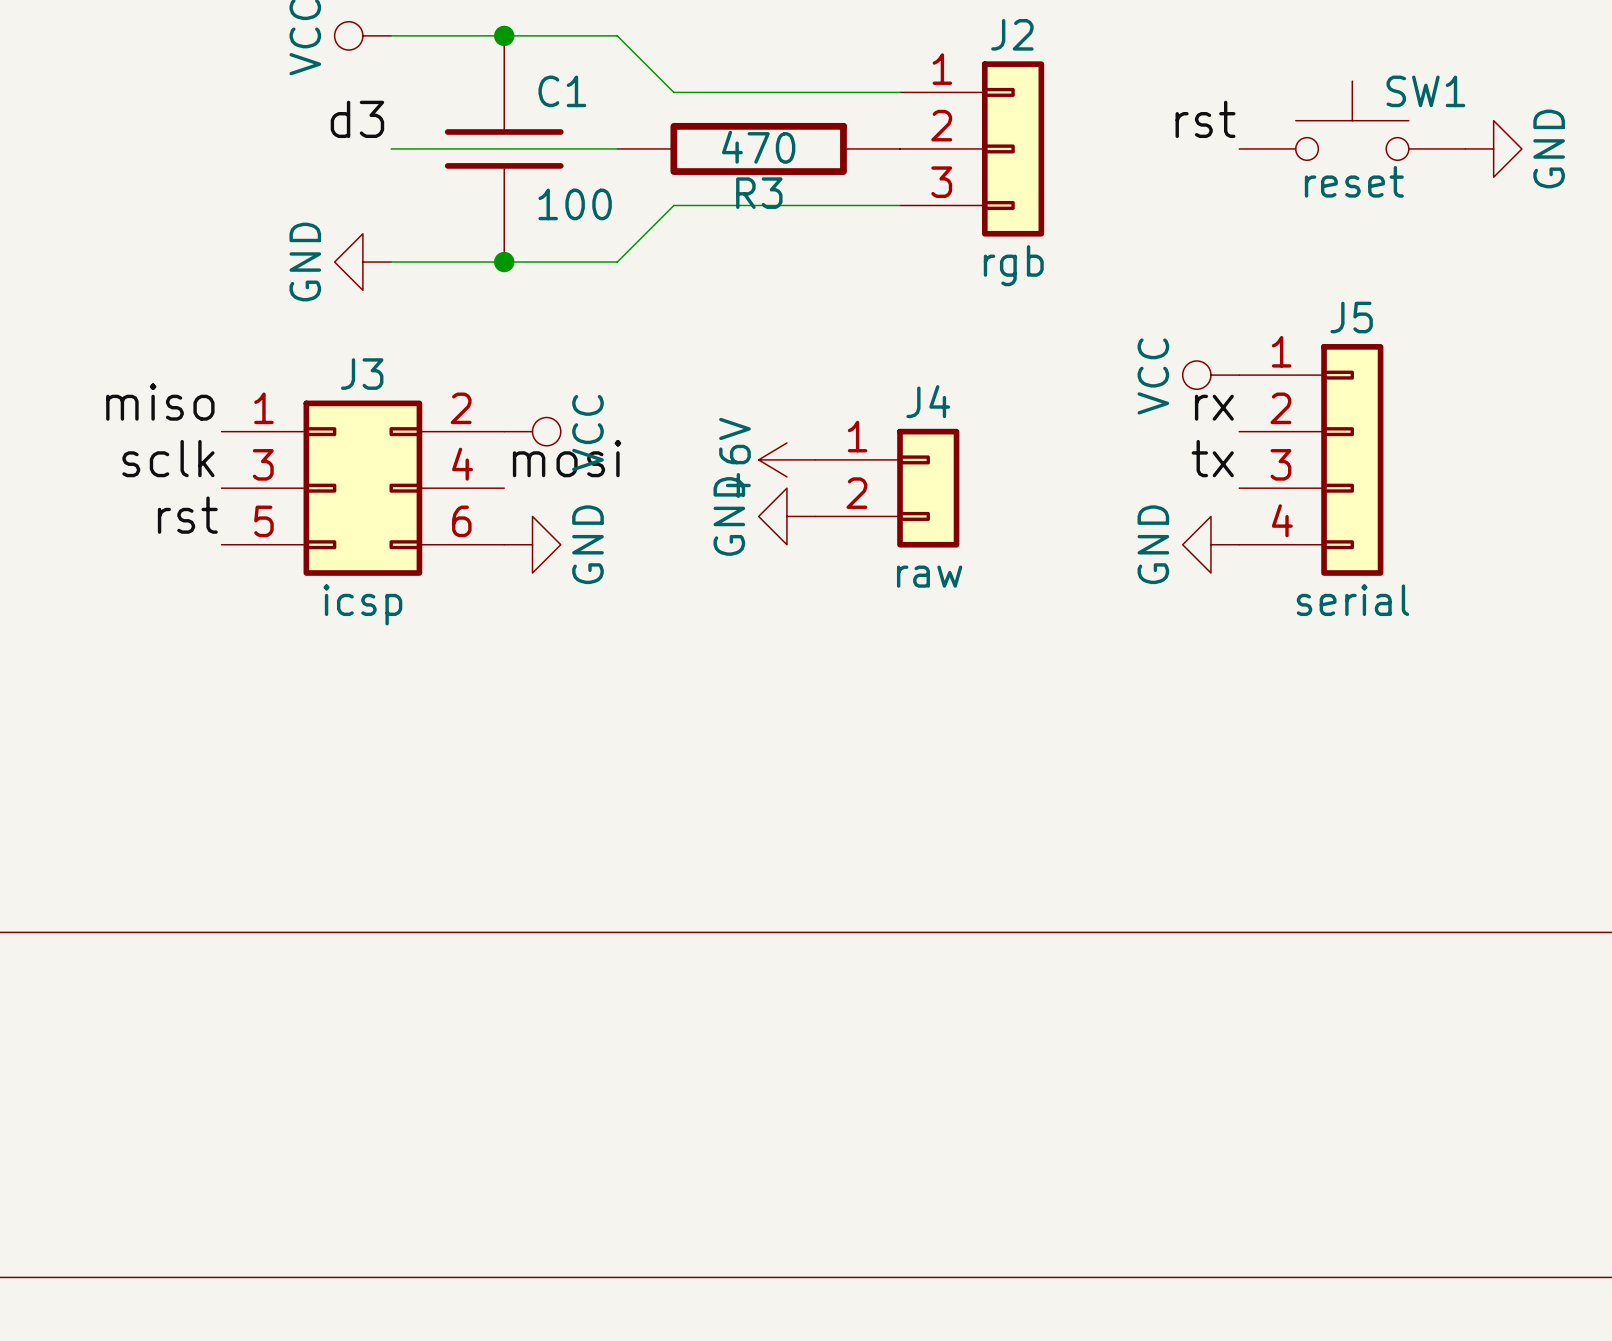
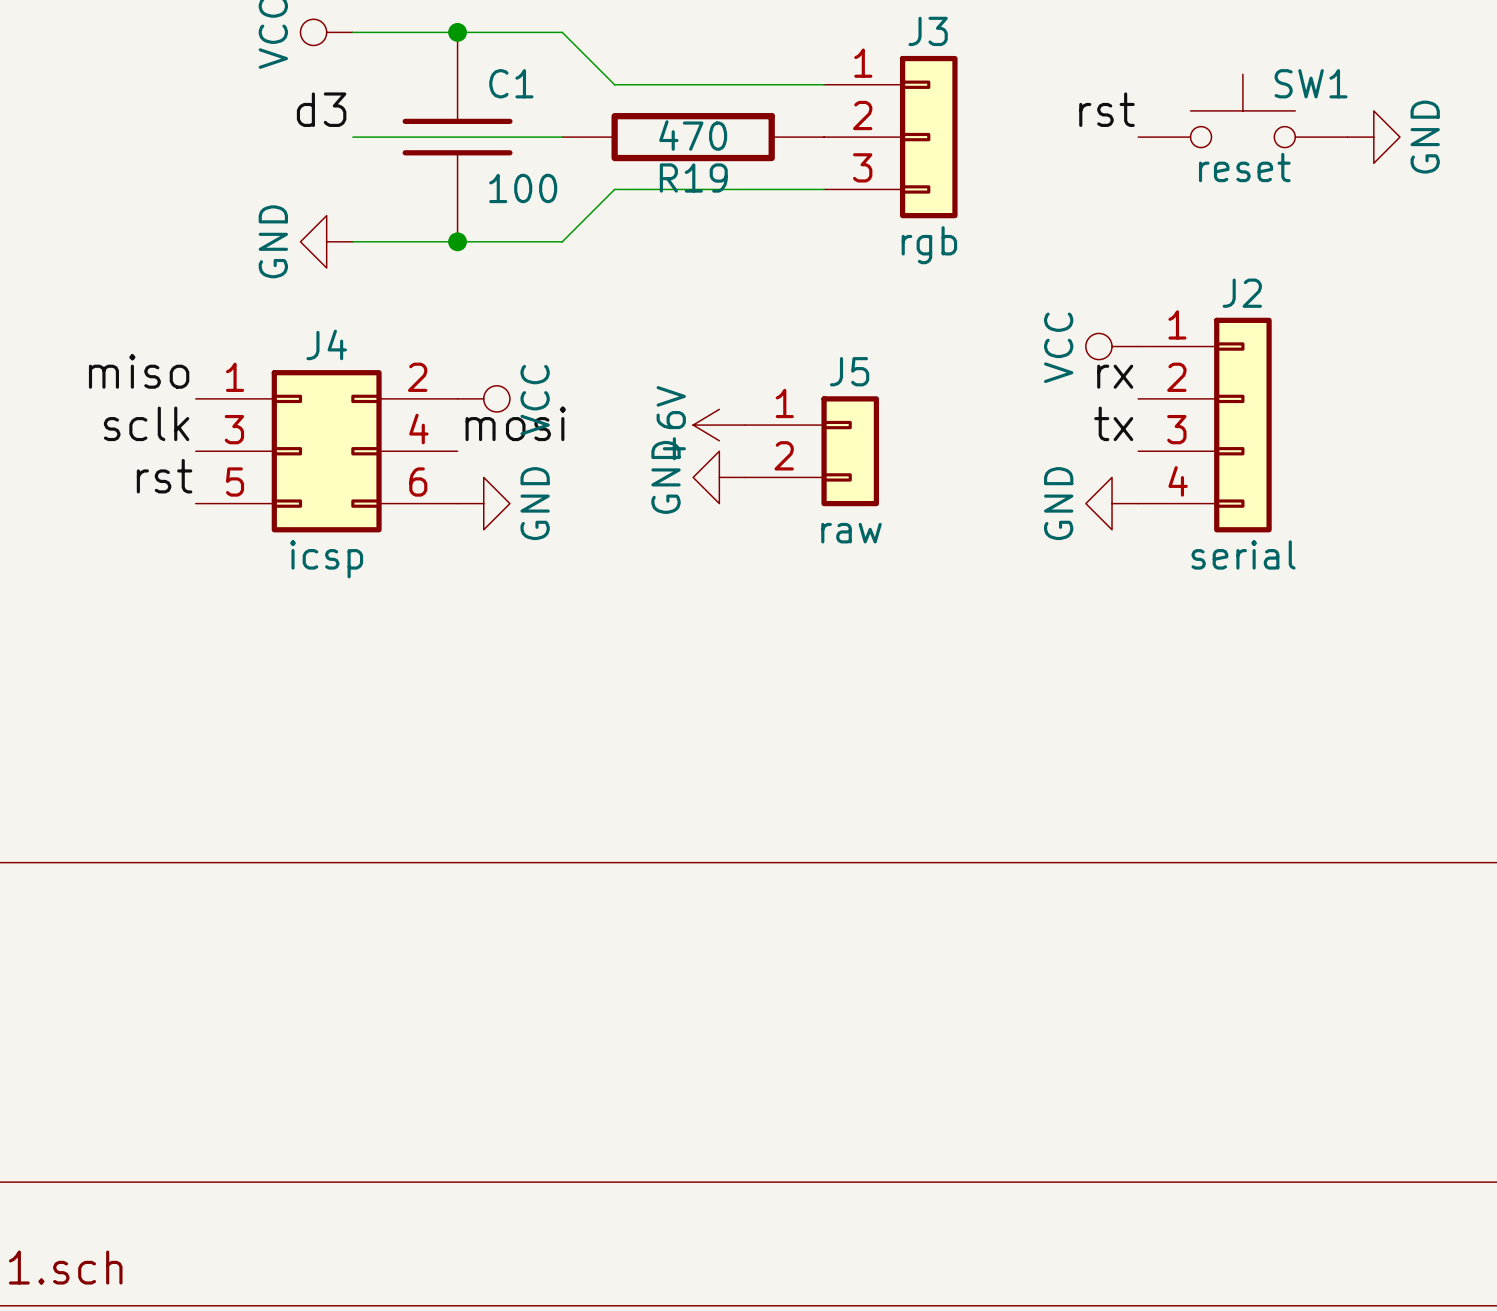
J2 name: J2 (1012, 34) -> J3 (928, 31)
R3 name: R3 (759, 193) -> R19 (693, 178)
J5 name: J5 (1351, 317) -> J2 (1242, 293)
J3 name: J3 (362, 374) -> J4 (326, 344)
J4 name: J4 (928, 401) -> J5 (849, 371)

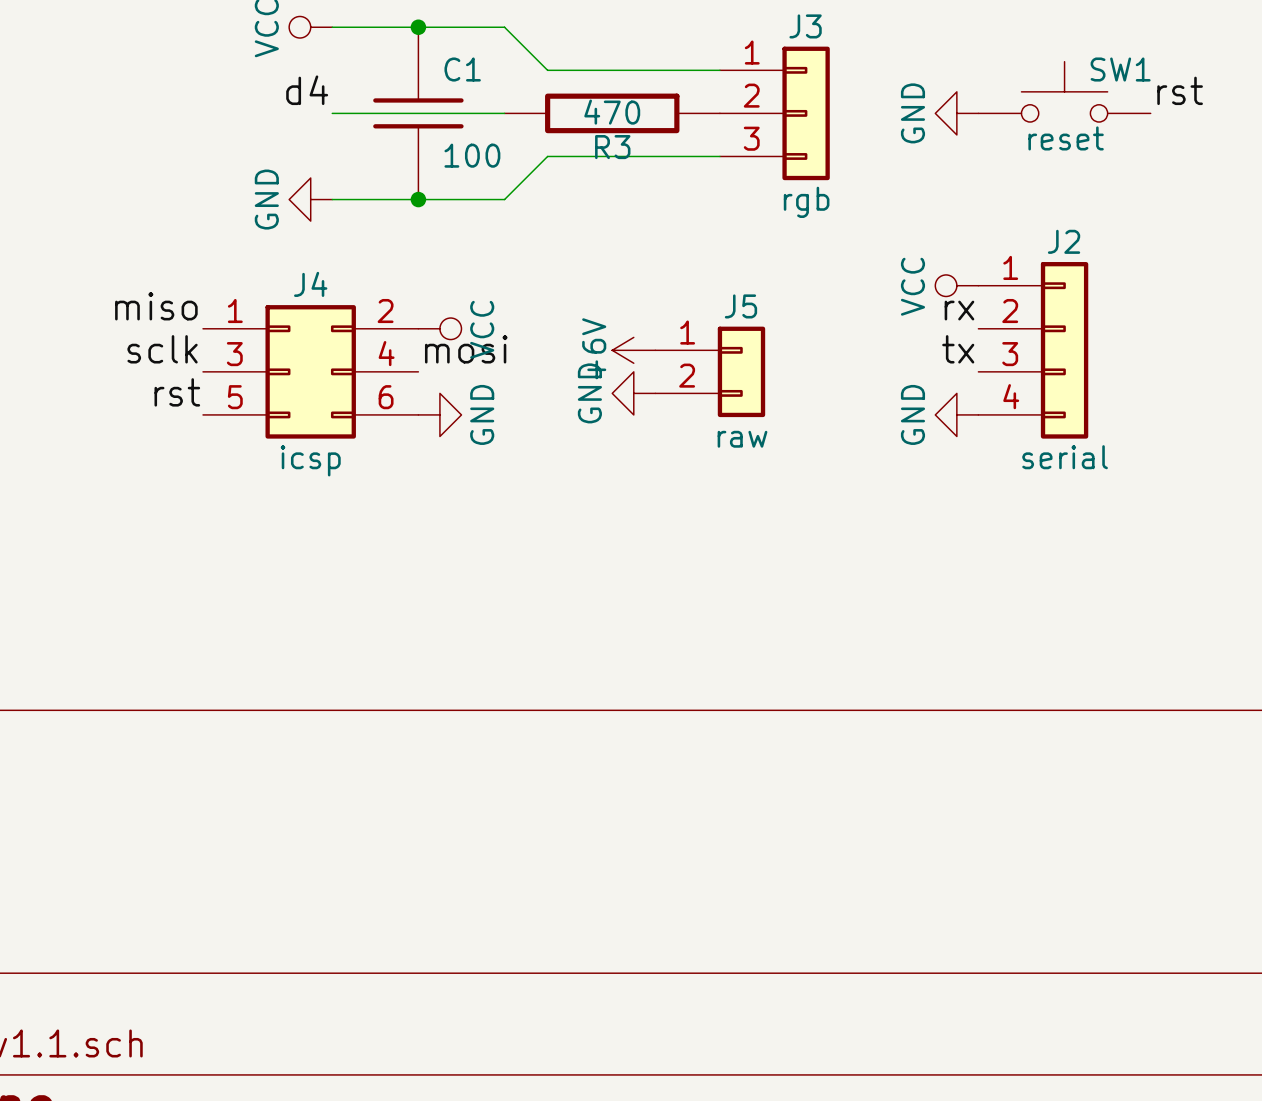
label: d3 (321, 109) -> d4 (307, 90)
label position: rst (1106, 109) -> rst (1180, 90)
power symbol rotation: 0° (1373, 137) -> 180° (956, 113)
power symbol position: GND (1373, 137) -> GND (956, 113)
R19 name: R19 (693, 178) -> R3 (612, 147)

